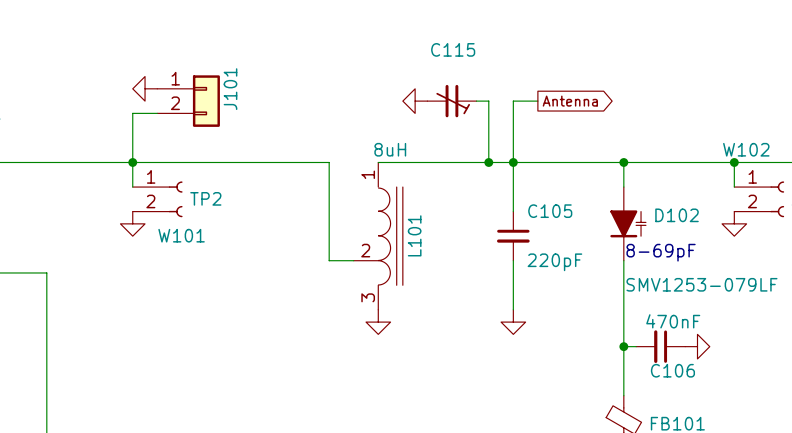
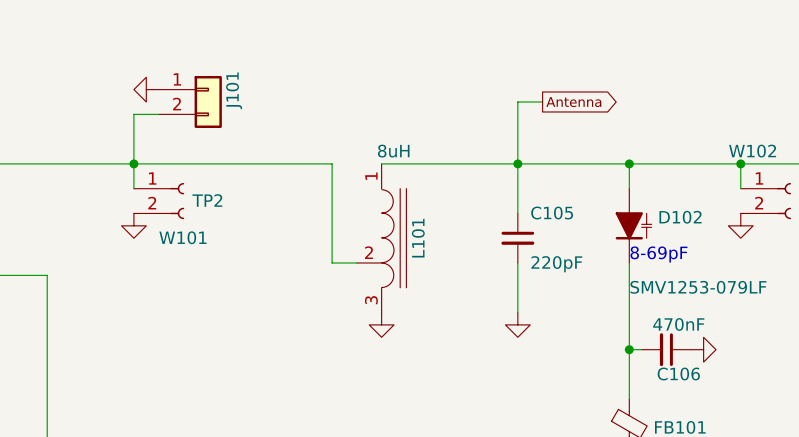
power symbol: (415, 101) -> none
C115: (451, 101) -> none
wire: (476, 101) (488, 101) (488, 162) -> none
junction: (488, 162) -> none

